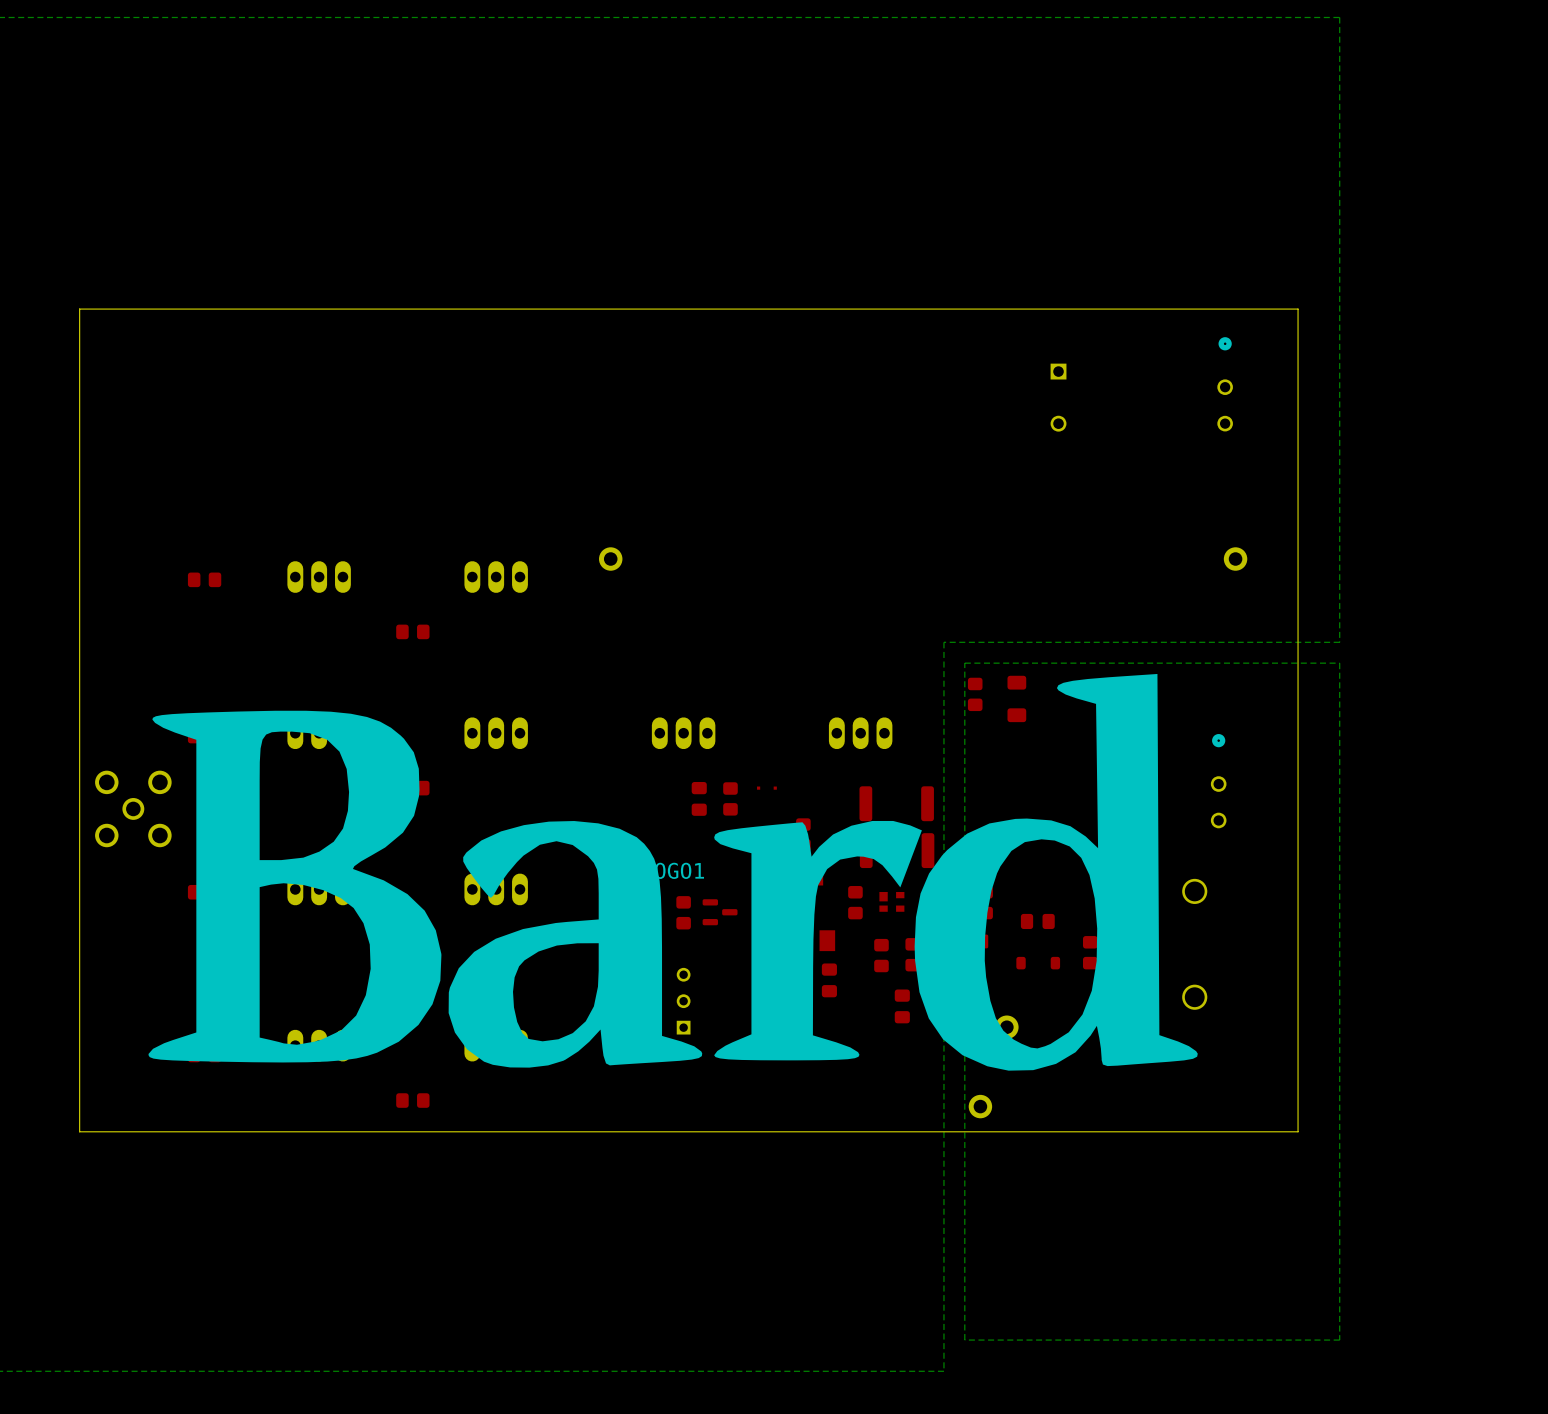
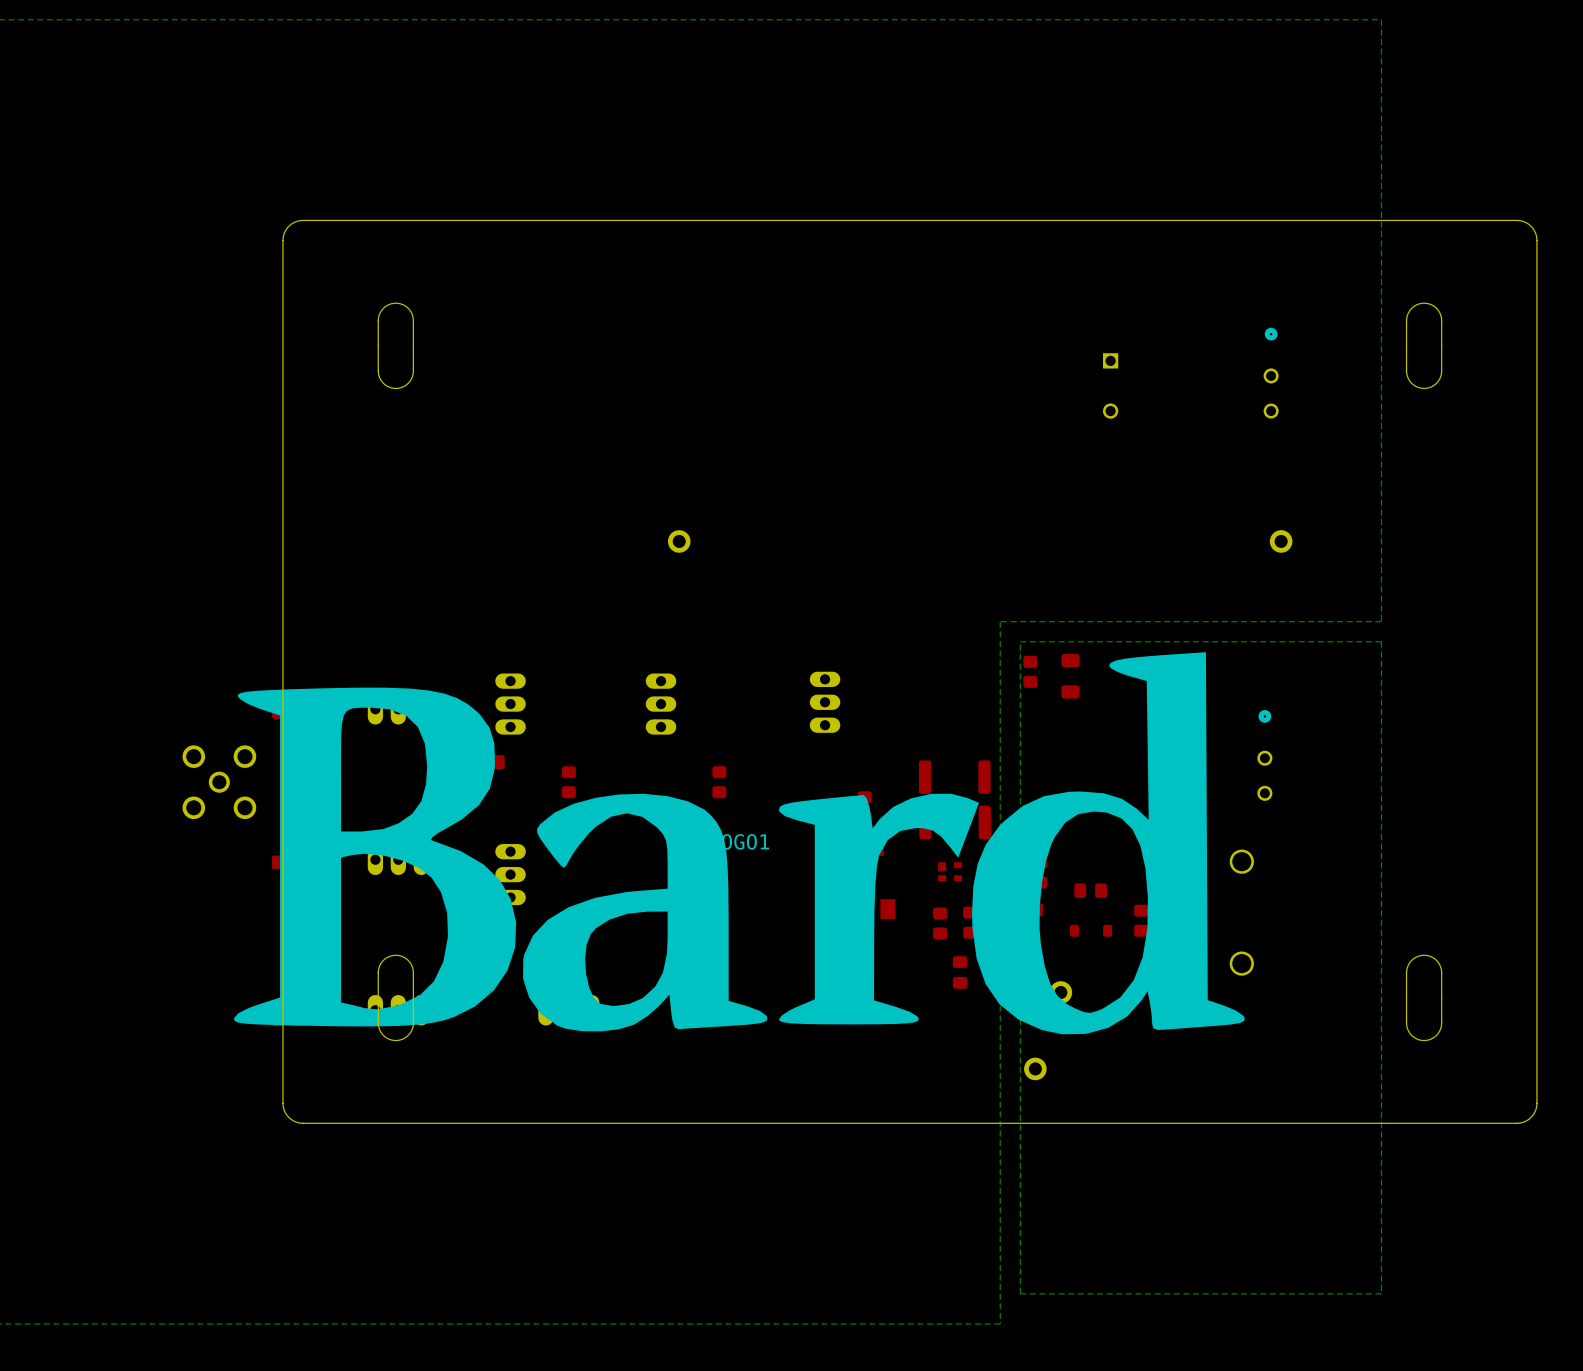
drawing: none -> [282, 219, 1538, 1124]
board edge: (1298, 309) (79, 309) (79, 1131) (1298, 1131) (1298, 309) -> none
part: (319, 577) -> none
part: (496, 577) -> none
part: (204, 579) -> none
part: (412, 631) -> none
part: none -> (825, 702)
part: none -> (510, 704)
part: none -> (661, 704)
part: (496, 733) -> none
part: (683, 733) -> none
part: (860, 733) -> none
part: (766, 788) -> none
part: (699, 798) -> none
part: (730, 798) -> none
part: none -> (568, 782)
part: none -> (719, 782)
part rotation: 0° (496, 889) -> 90° clockwise (510, 874)
part position: (496, 889) -> (510, 874)
part: (855, 902) -> none
part: (683, 912) -> none
part: (720, 912) -> none
part: (829, 980) -> none
part: (683, 1001) -> none
part: (412, 1100) -> none

